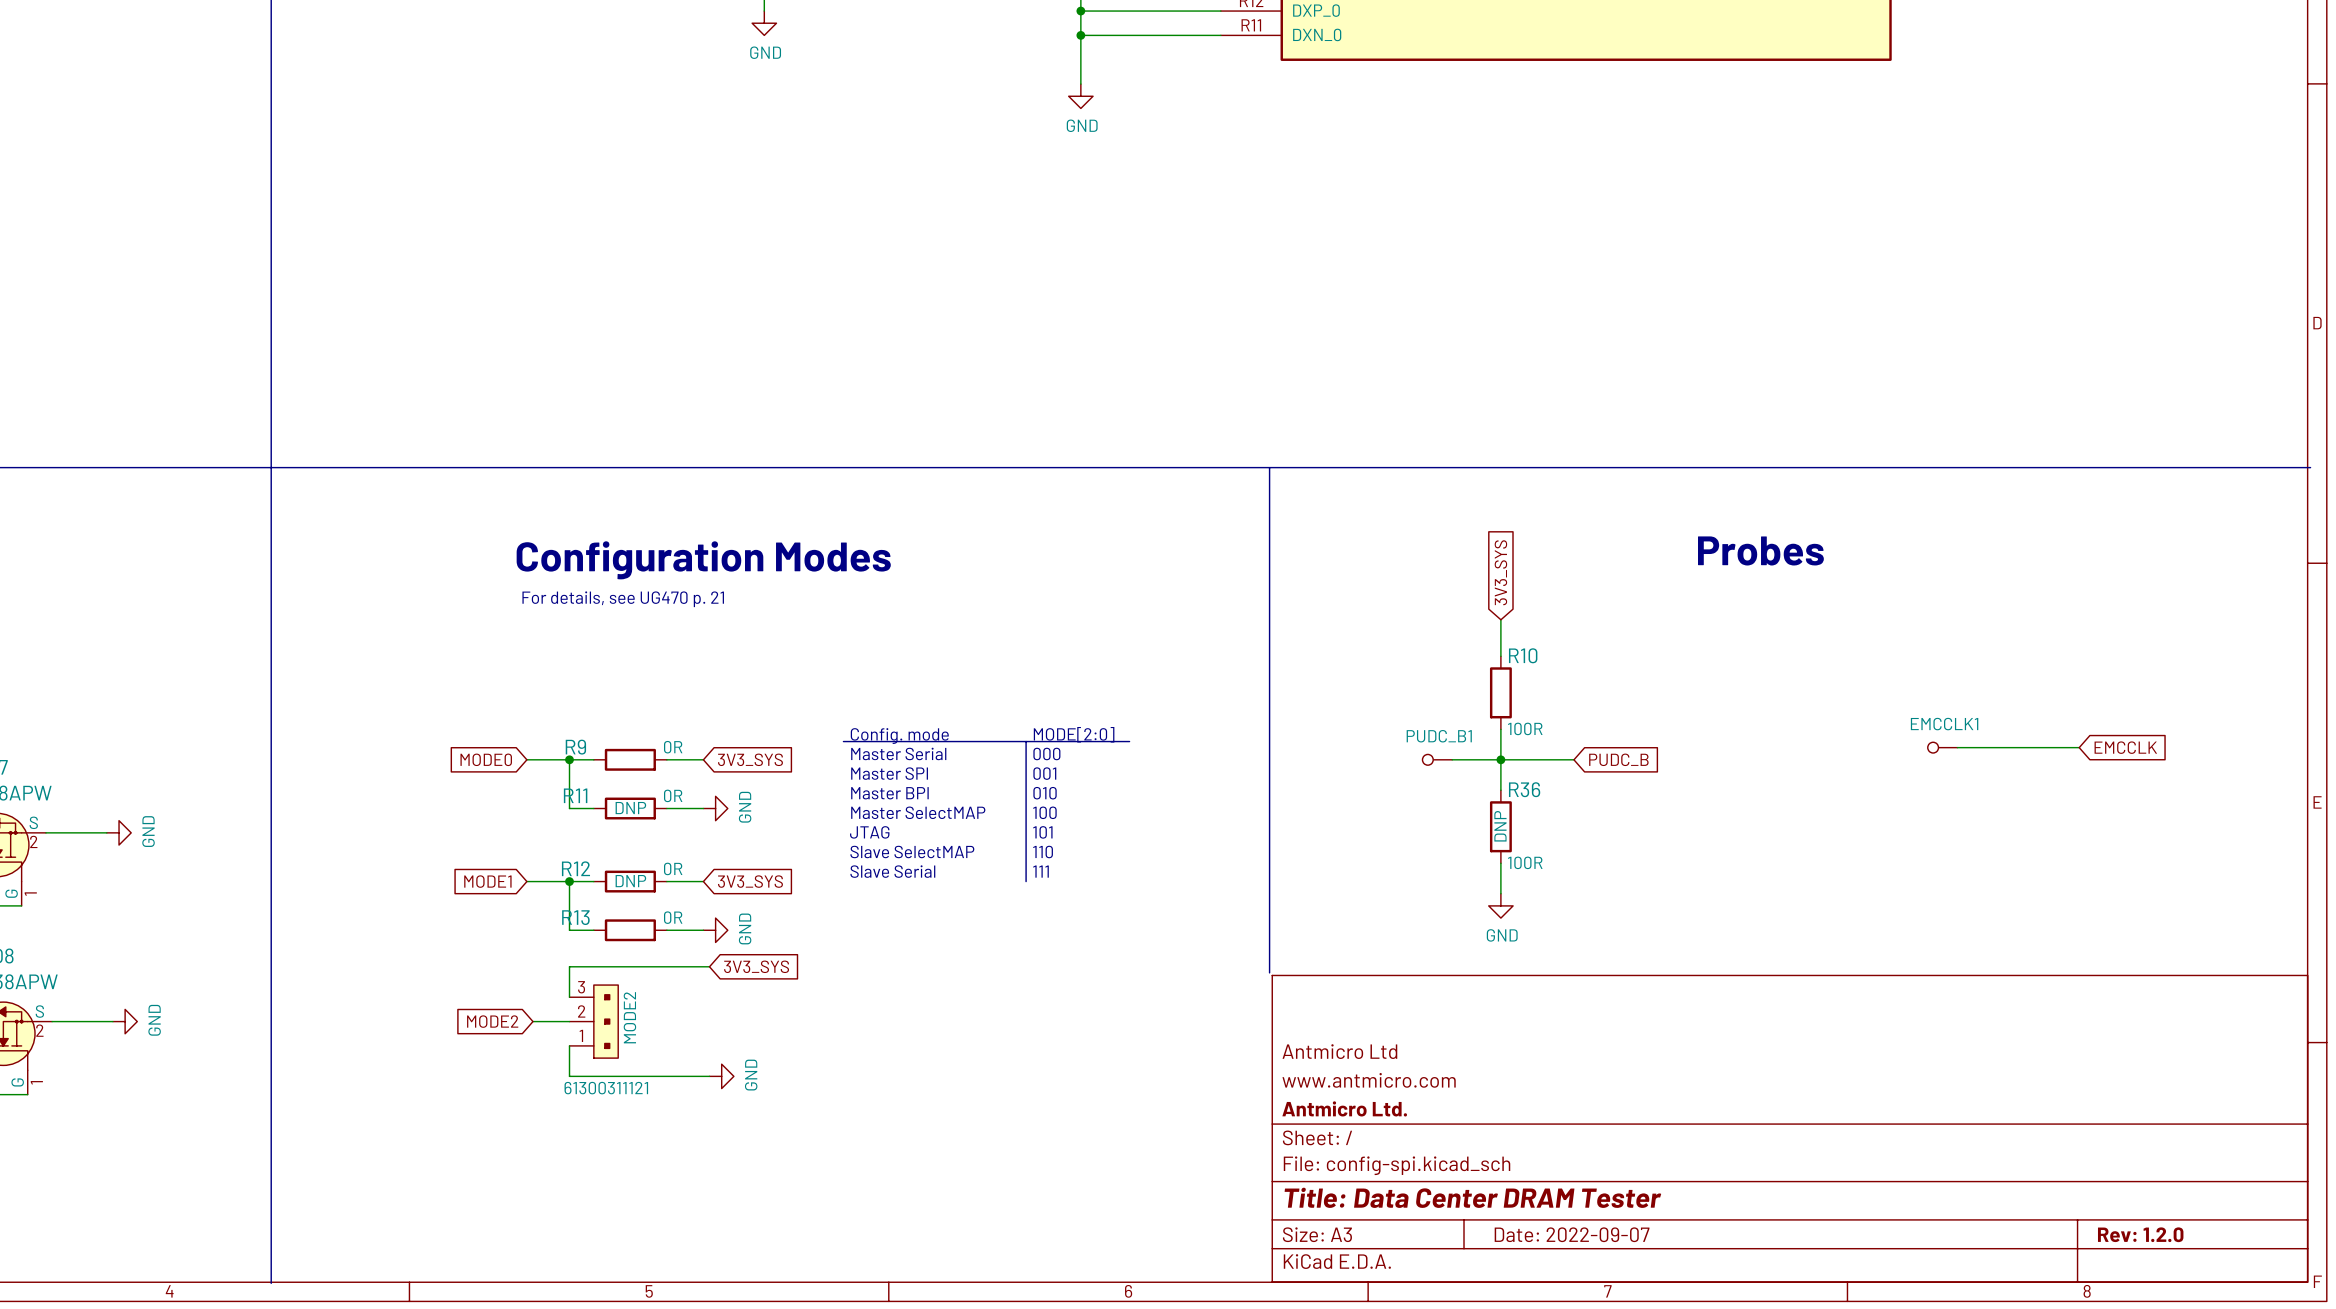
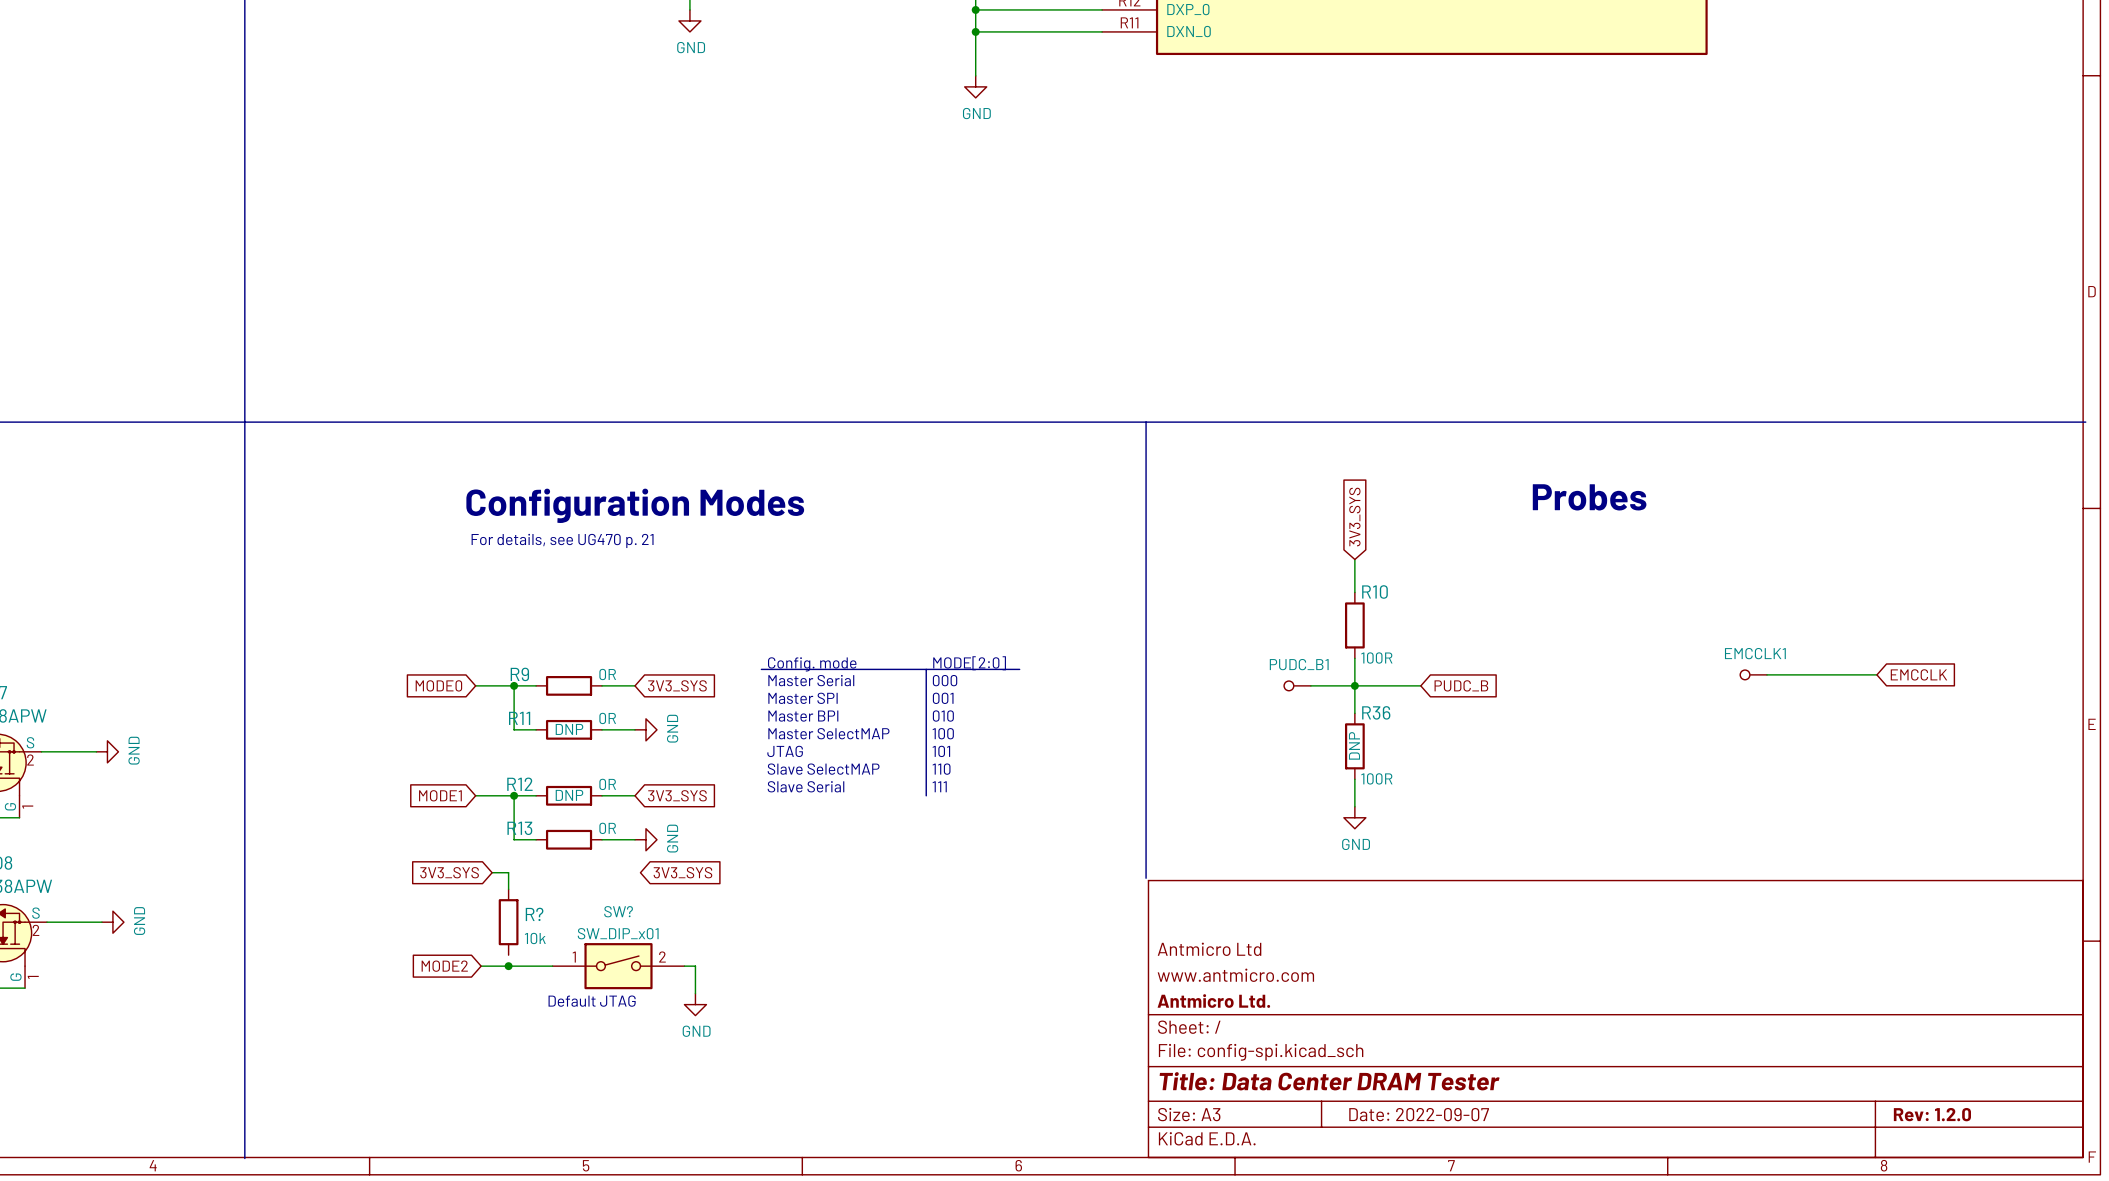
global label: none -> 3V3_SYS (449, 872)
wire: none -> (492, 872) (508, 872) (508, 889)
wire: (709, 966) (569, 966) (569, 997) -> none
global label position: MODE2 (492, 1021) -> MODE2 (444, 966)
wire: (532, 1021) (569, 1021) -> none
R?: none -> (508, 922)
MODE2: 61300311121 (593, 1021) -> none
wire: (569, 1045) (569, 1076) (709, 1076) -> none
wire: none -> (481, 966) (552, 966)
junction: none -> (508, 966)
SW?: none -> SW_DIP_x01 (618, 966)
wire: none -> (684, 966) (695, 966) (695, 993)
power symbol rotation: 0° (721, 1076) -> 90° clockwise (695, 1004)
power symbol position: GND (721, 1076) -> GND (695, 1004)
text: none -> Default JTAG (592, 1001)

